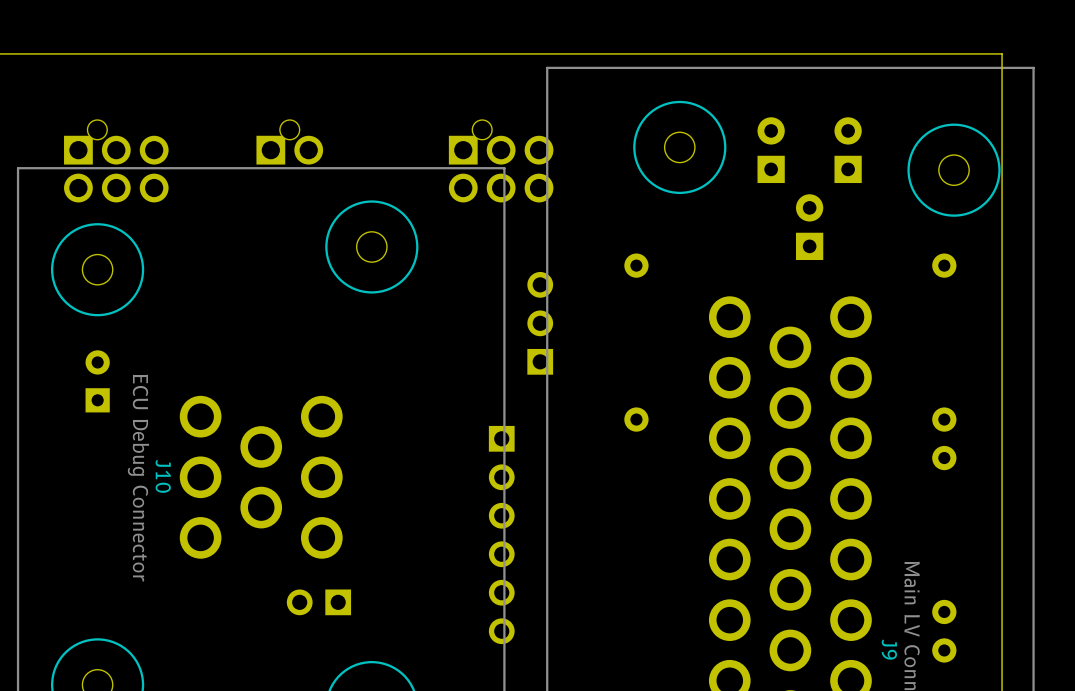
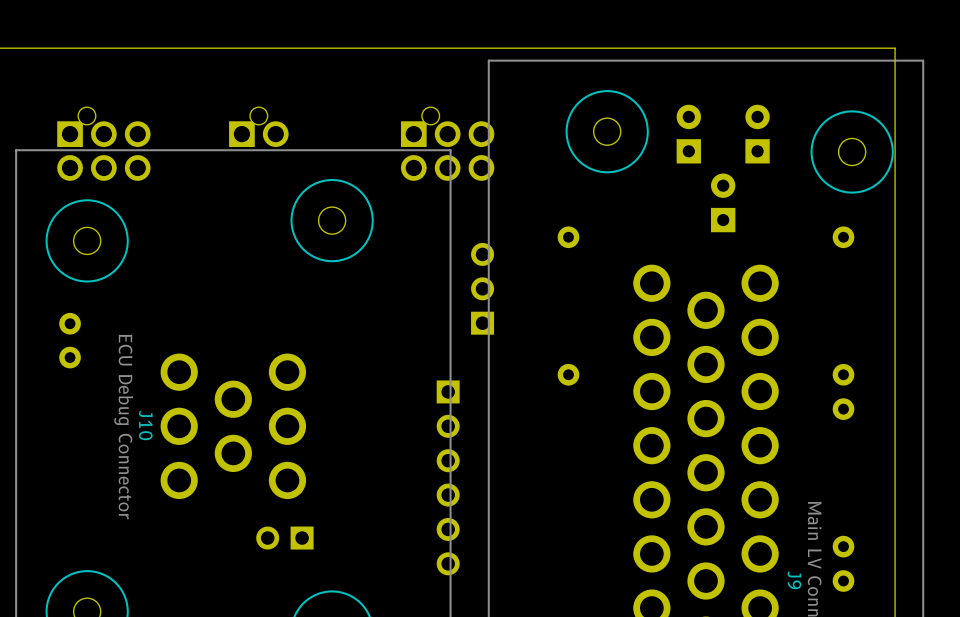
part: none -> (70, 340)
part: (97, 381) -> none

